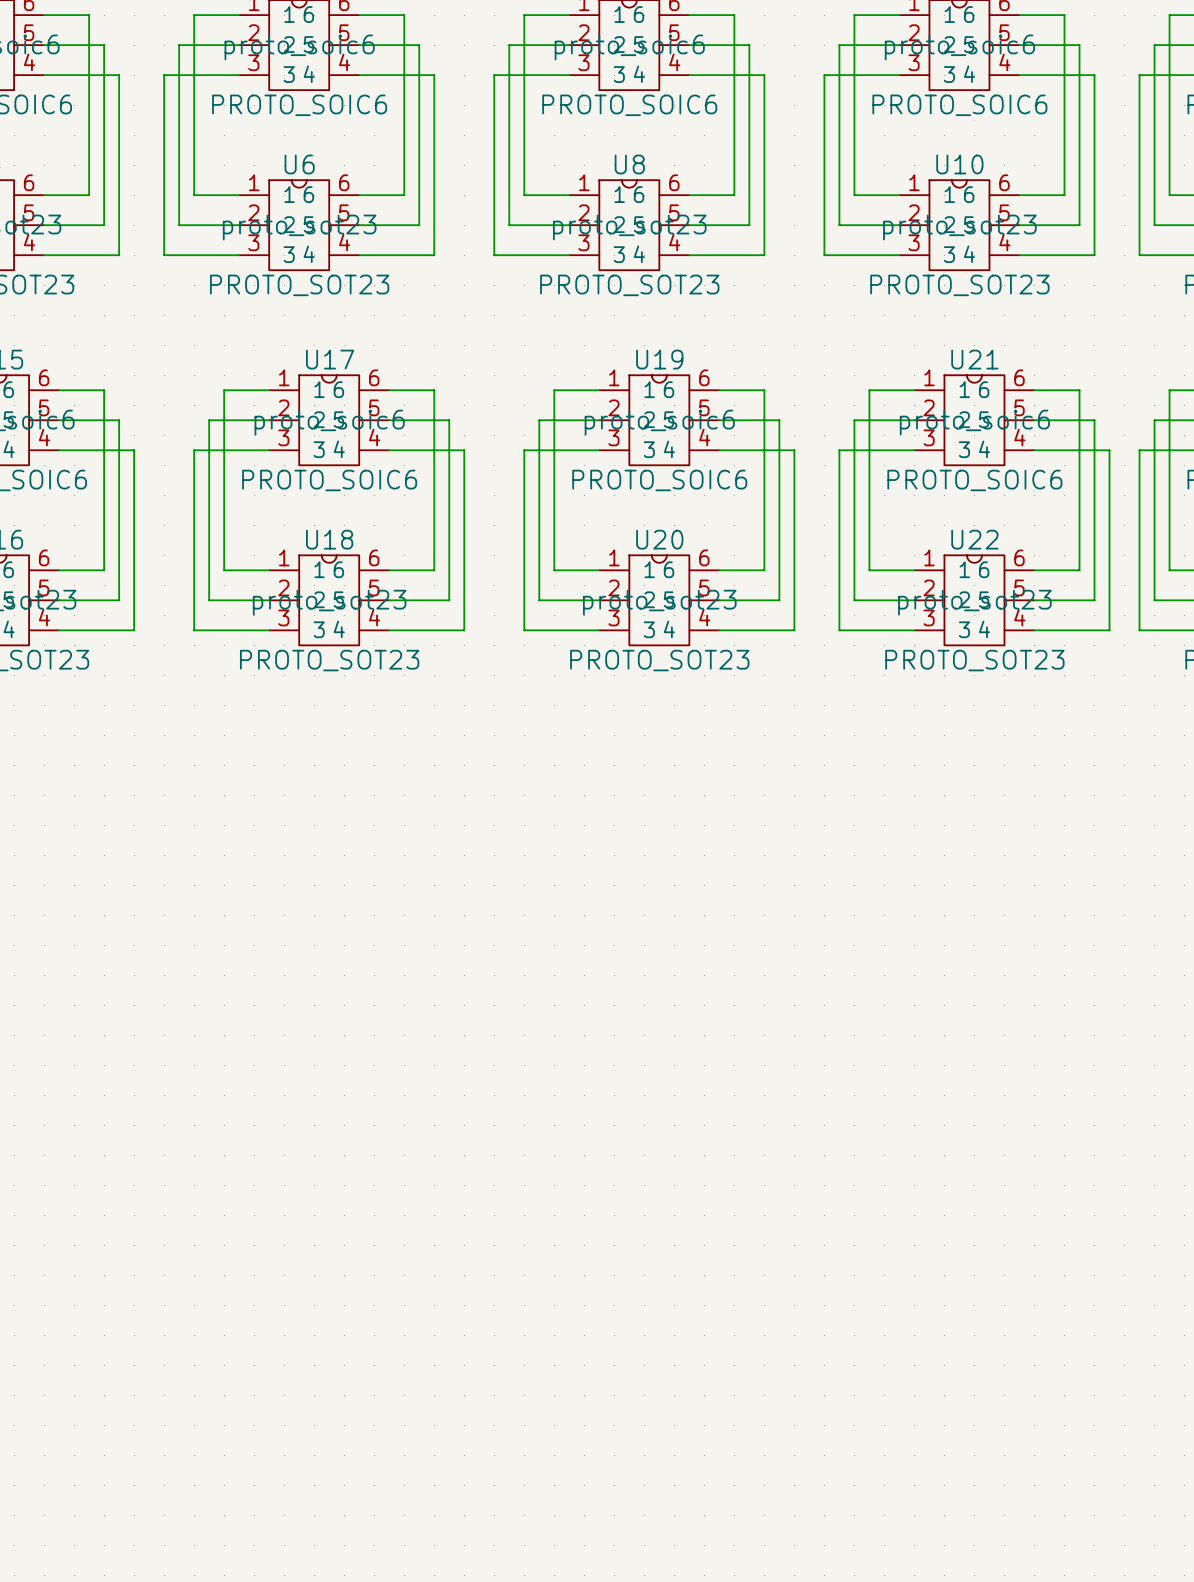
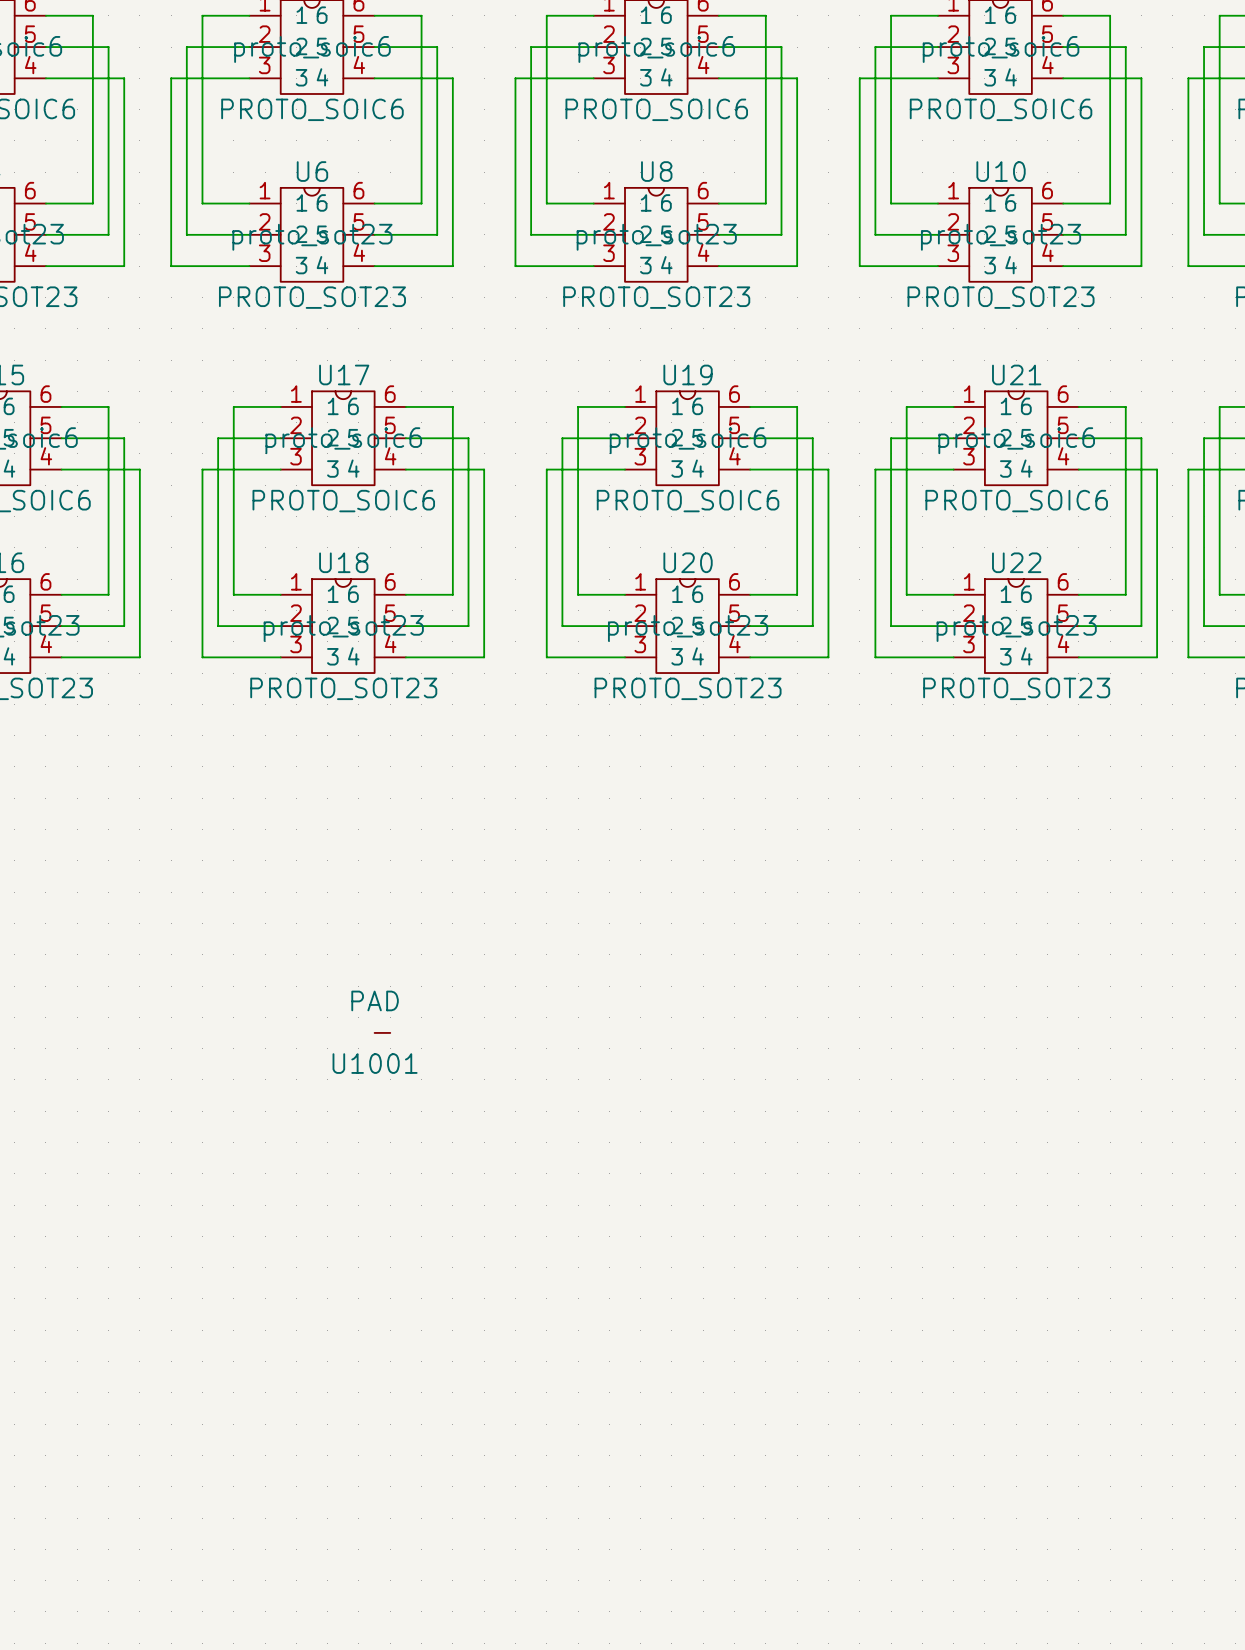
U1001: none -> PAD (382, 1032)

